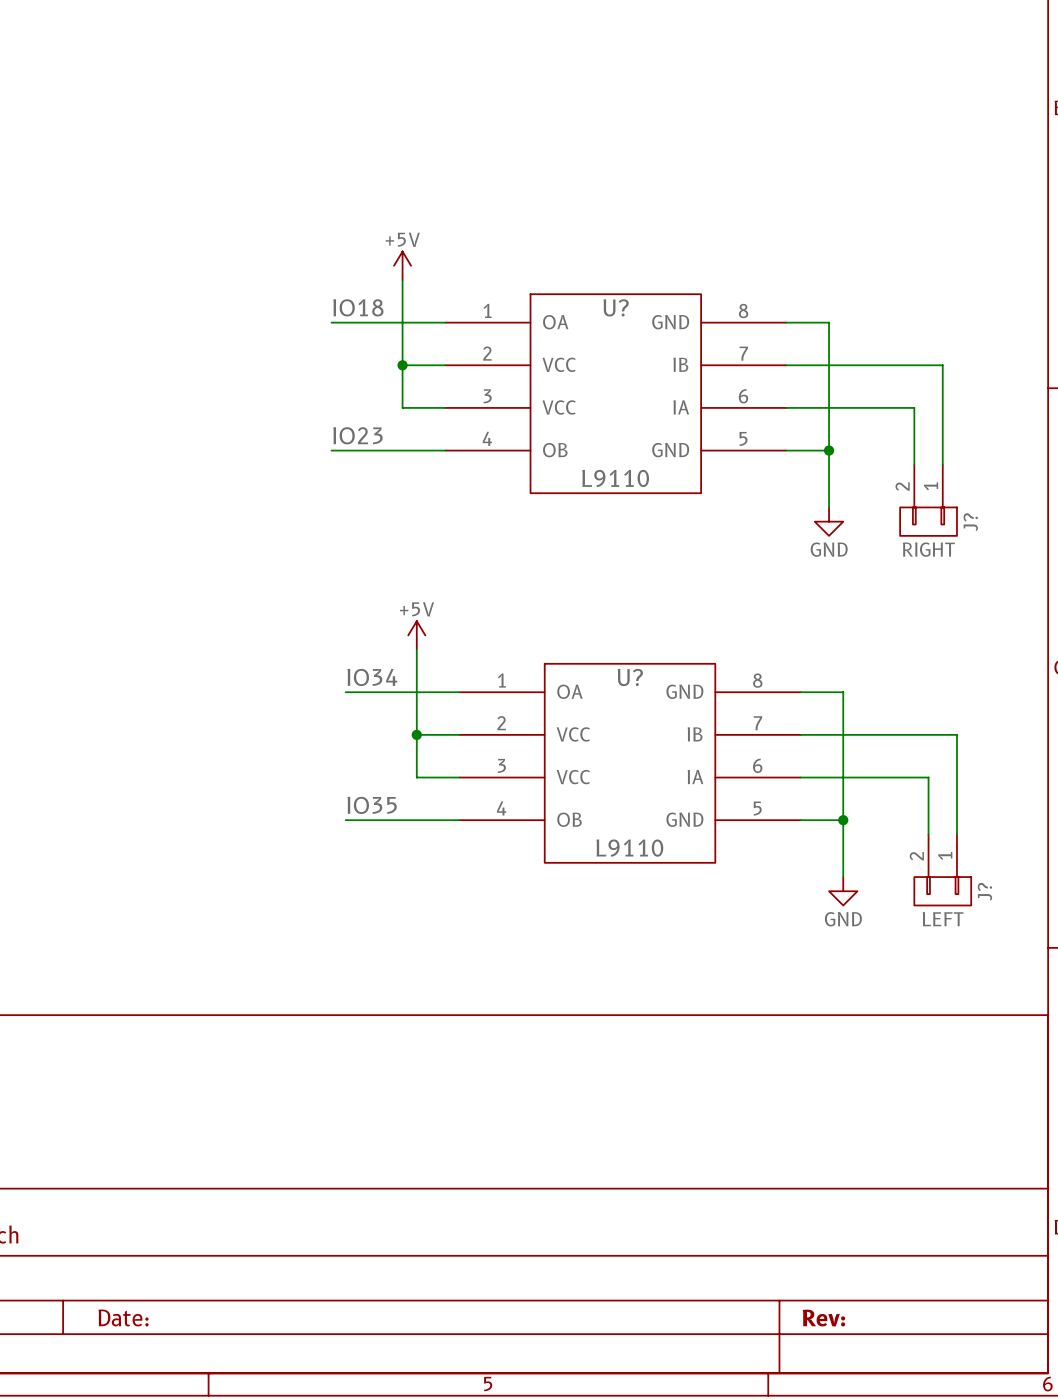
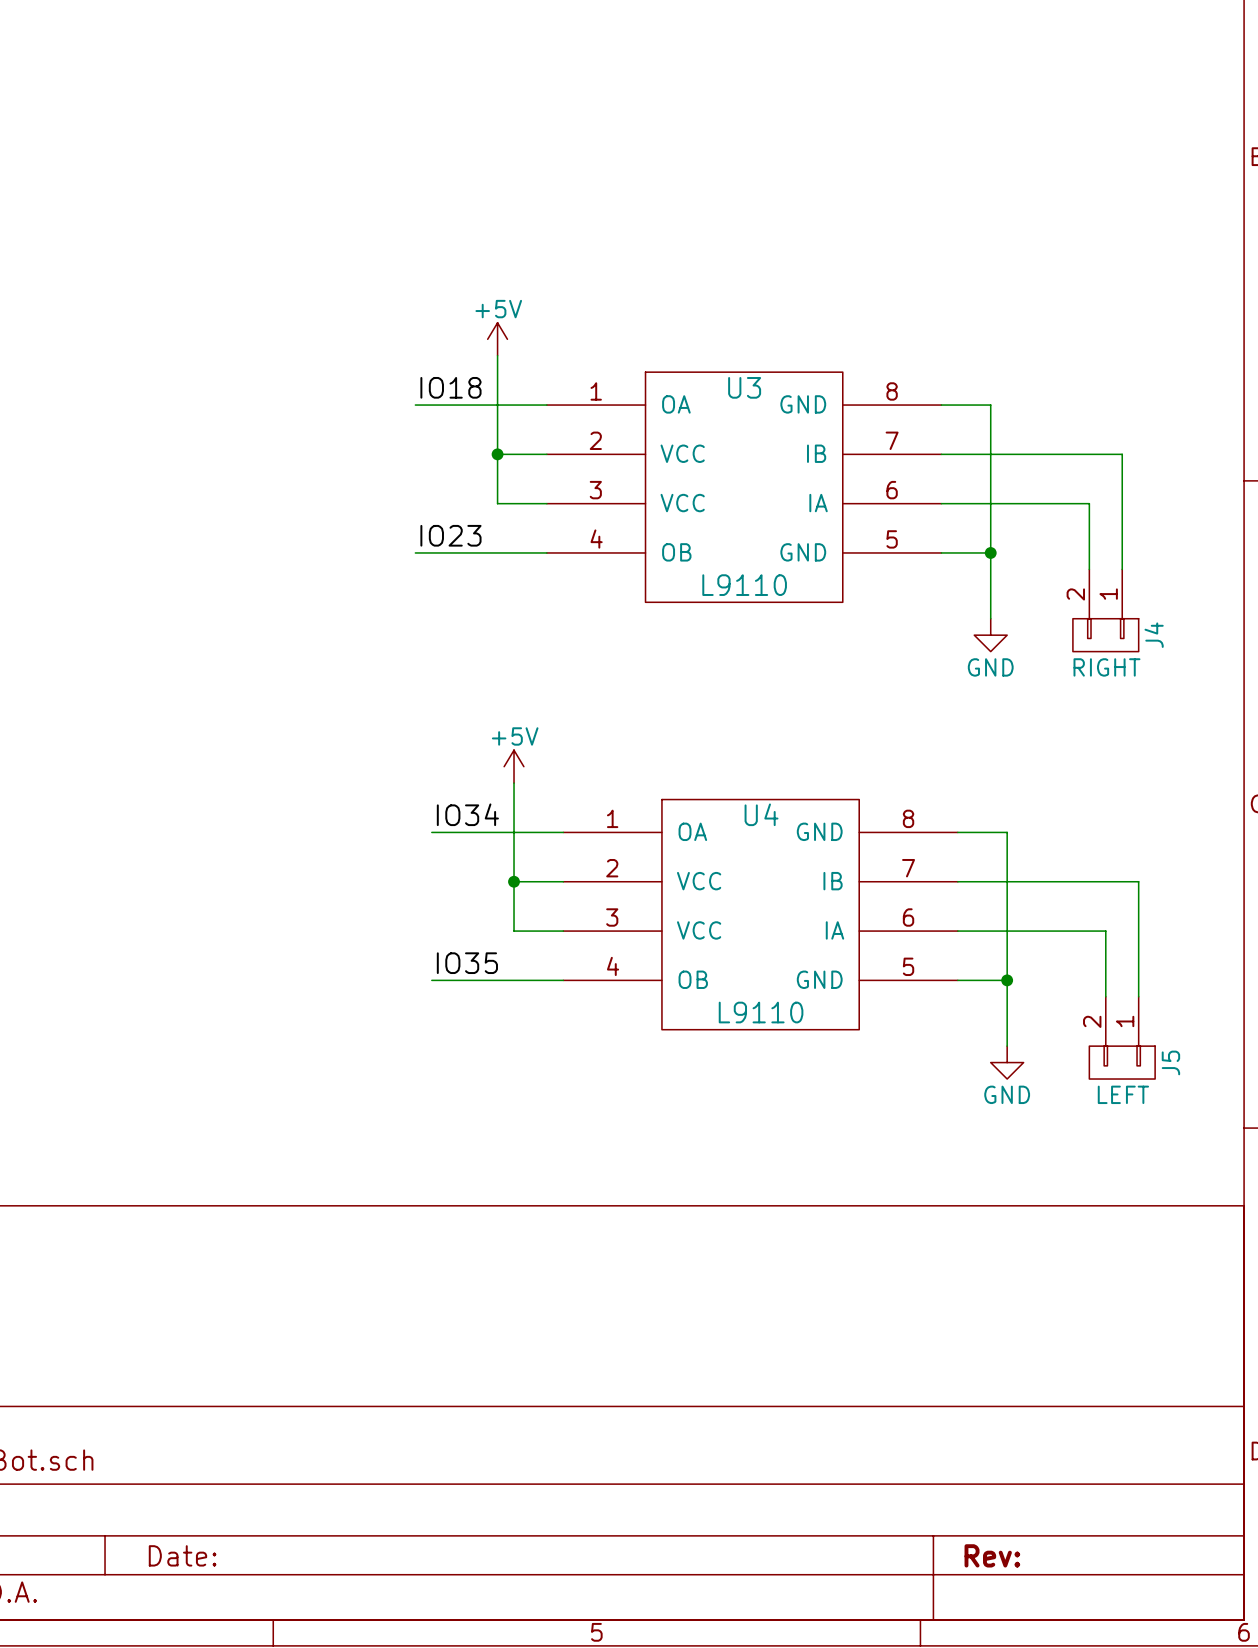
U? name: U? (616, 307) -> U3 (744, 387)
J? name: J? (970, 522) -> J4 (1154, 635)
U? name: U? (630, 677) -> U4 (761, 814)
J? name: J? (984, 891) -> J5 (1170, 1062)

